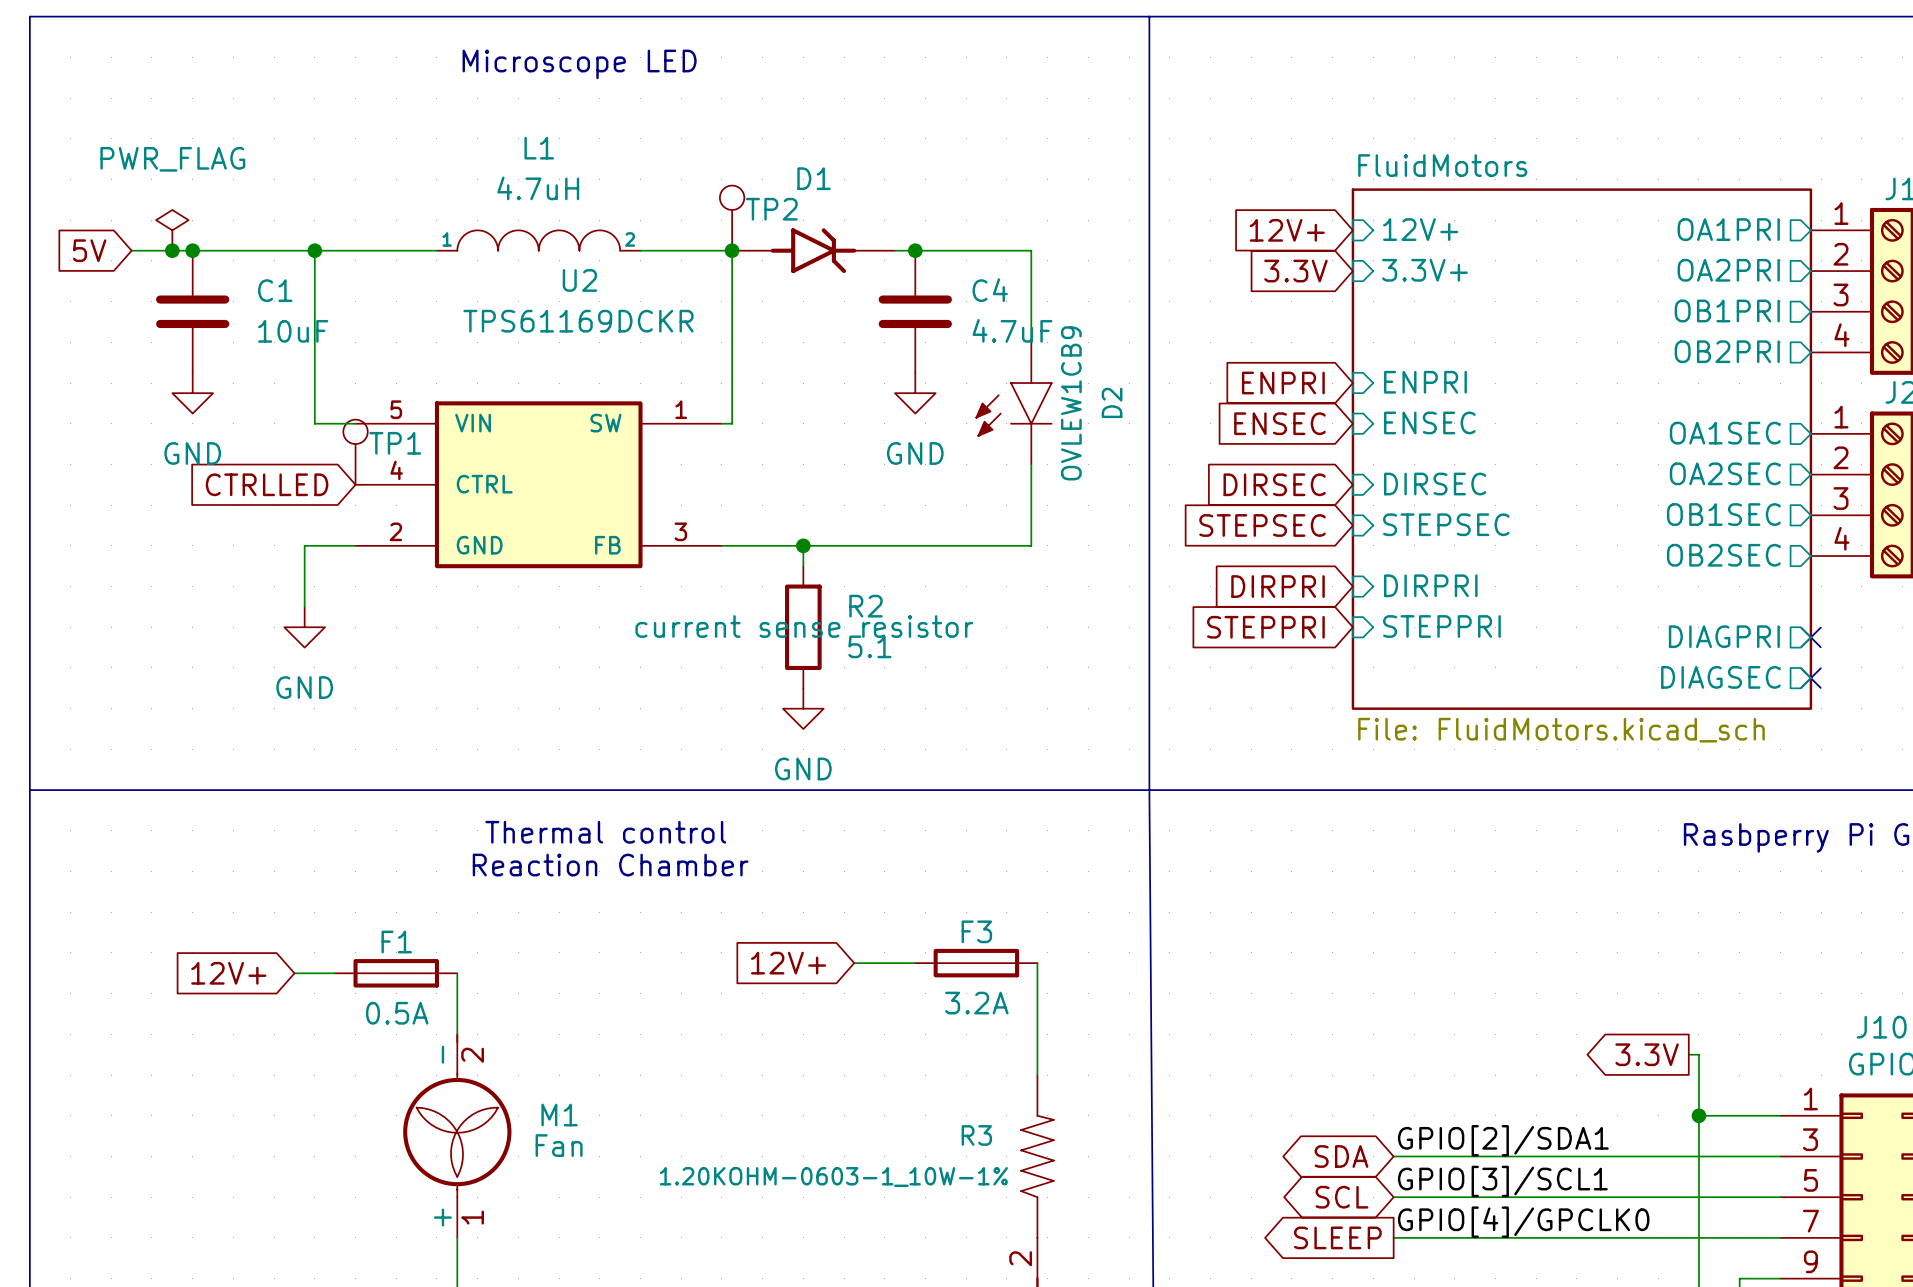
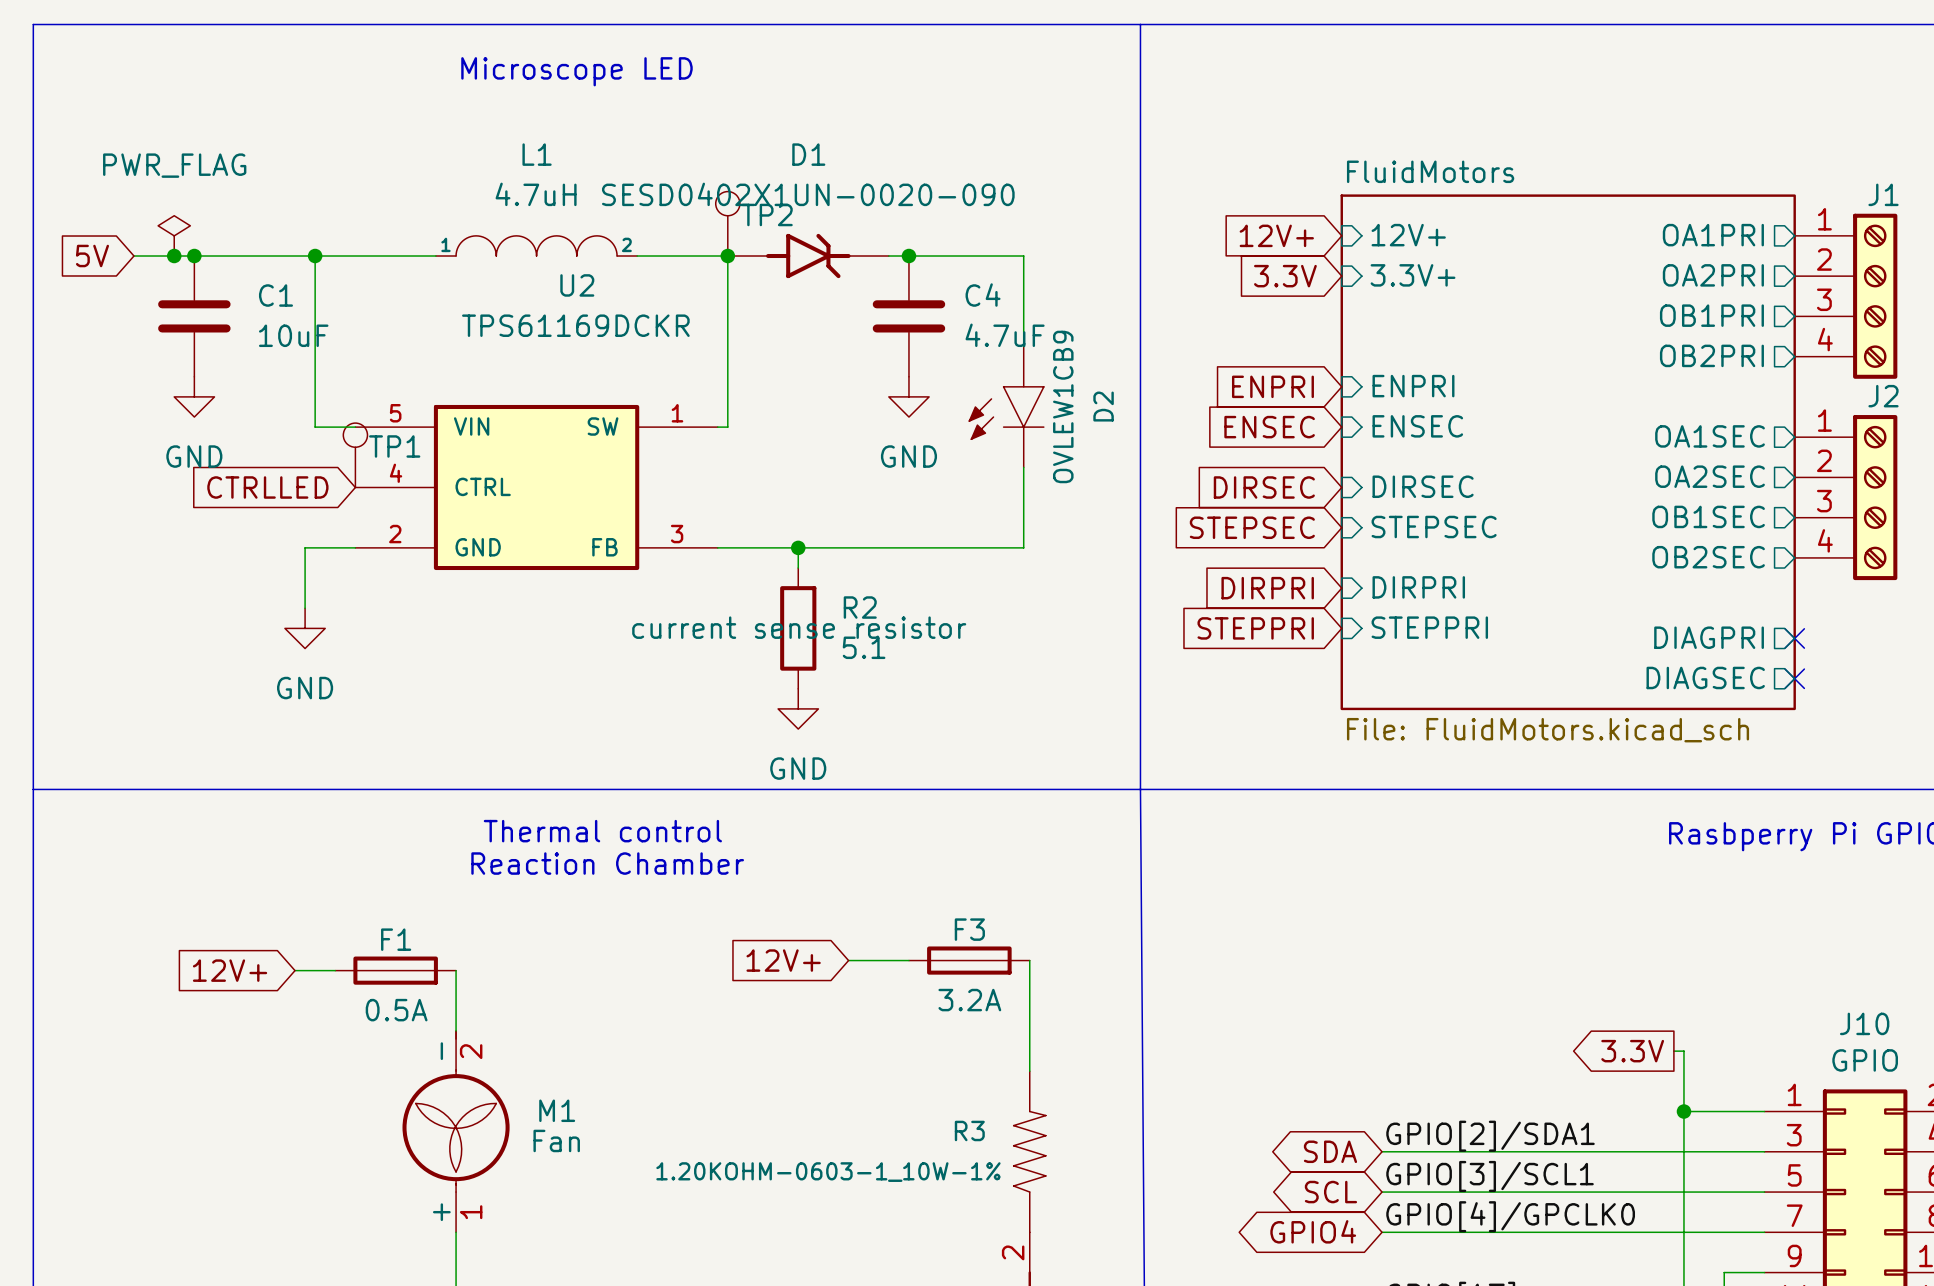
D1 name position: D1 (814, 178) -> D1 (808, 154)
D1 value: none -> SESD0402X1UN-0020-090 (808, 194)
global label shape: output (1337, 1237) -> bidirectional (1313, 1231)
global label: SLEEP (1337, 1237) -> GPIO4 (1313, 1231)

